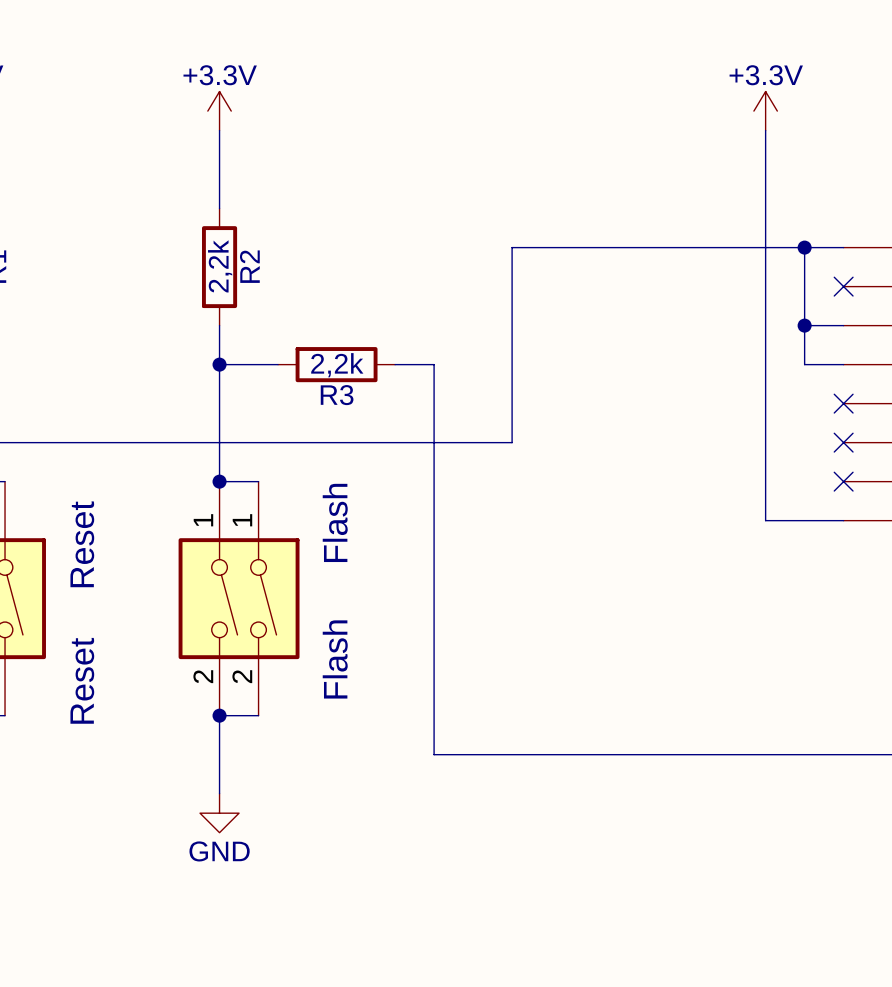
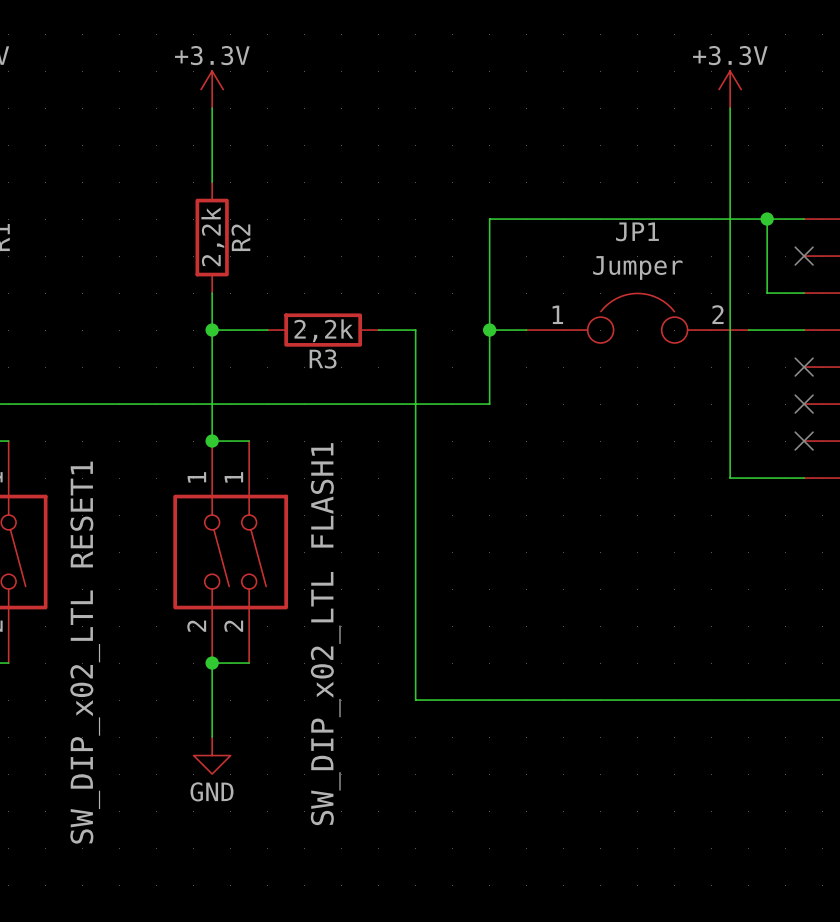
wire: (804, 325) (804, 364) -> (748, 330) (767, 330)
junction: (804, 325) -> none
JP1: none -> Jumper (637, 318)
wire: none -> (489, 330) (526, 330)
junction: none -> (489, 330)
Flash name: Flash (335, 522) -> FLASH1 (322, 495)
Reset name: Reset (82, 544) -> RESET1 (81, 514)
Flash value: Flash (335, 659) -> SW_DIP_x02_LTL (325, 698)
Reset value: Reset (82, 680) -> SW_DIP_x02_LTL (85, 717)

